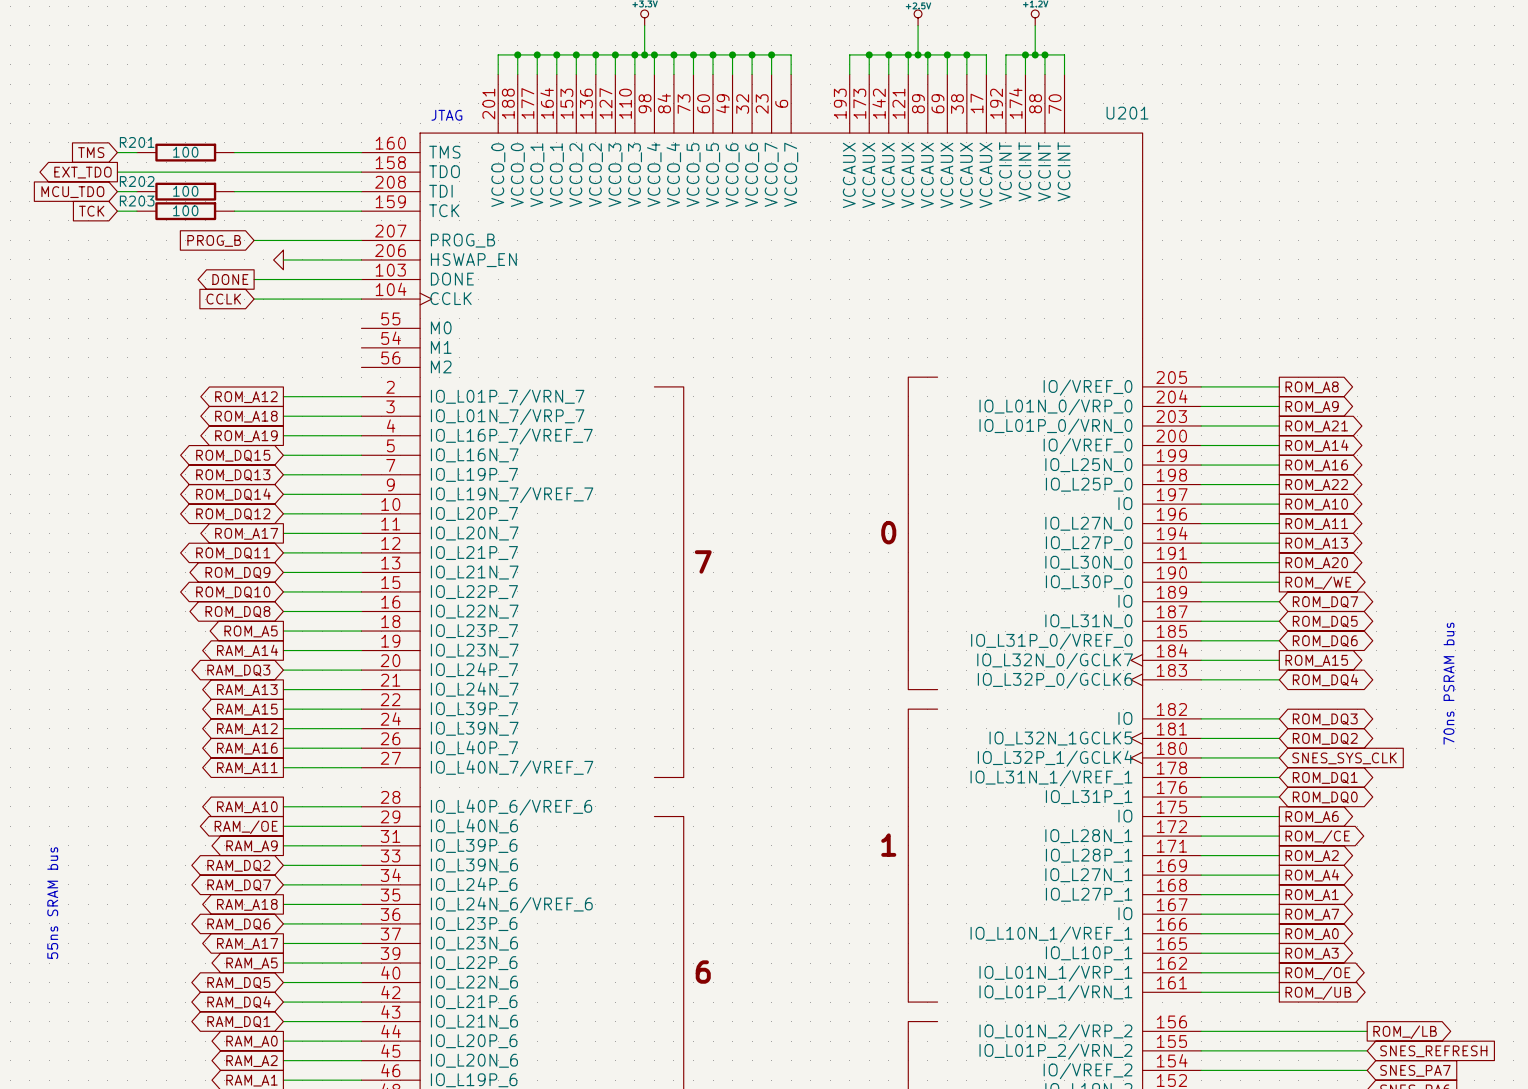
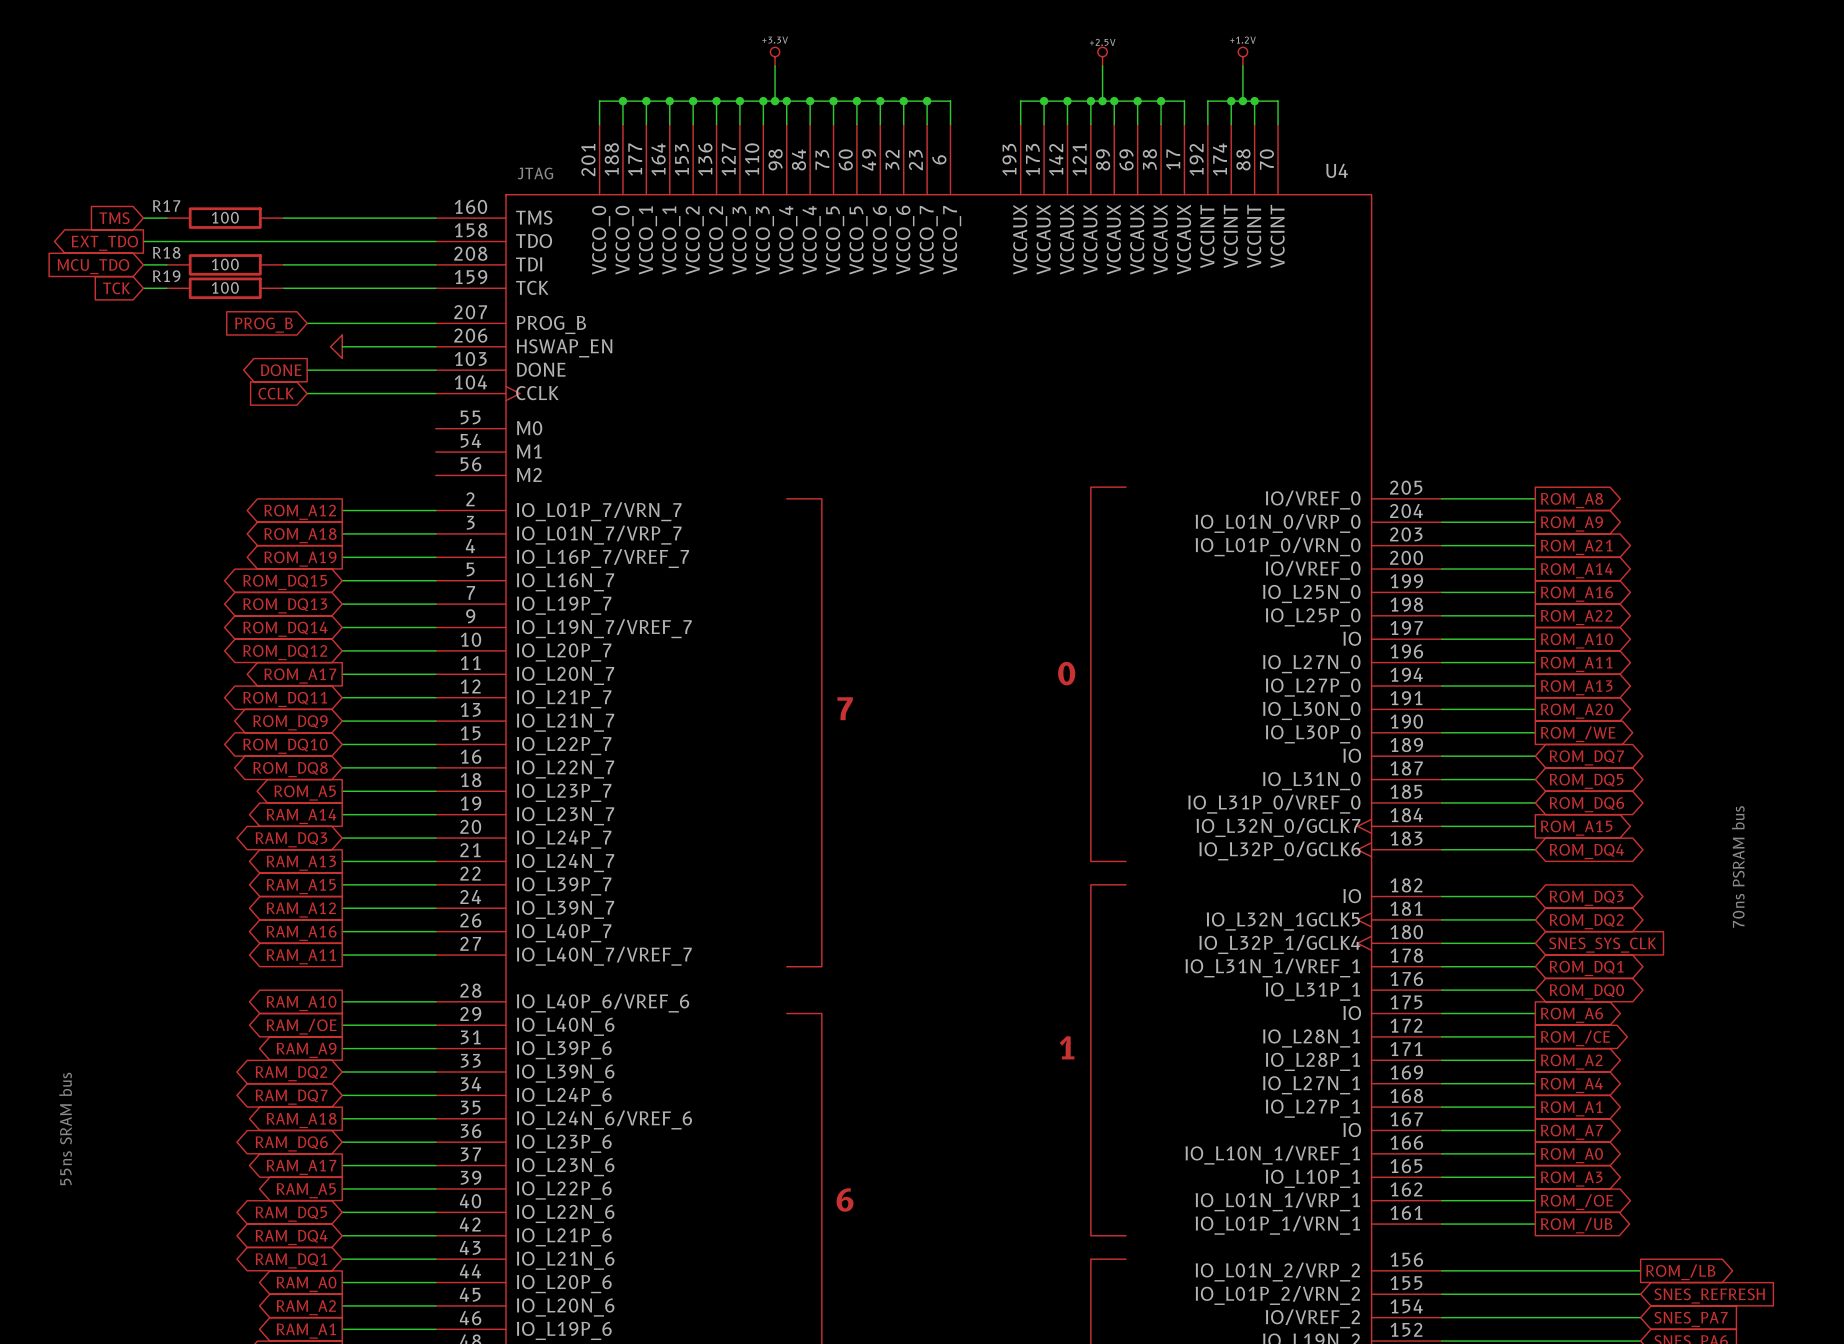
U201 name: U201 (1127, 113) -> U4 (1337, 170)
R201 name: R201 (137, 142) -> R17 (166, 205)
R202 name: R202 (137, 181) -> R18 (166, 252)
R203 name: R203 (137, 201) -> R19 (166, 276)

